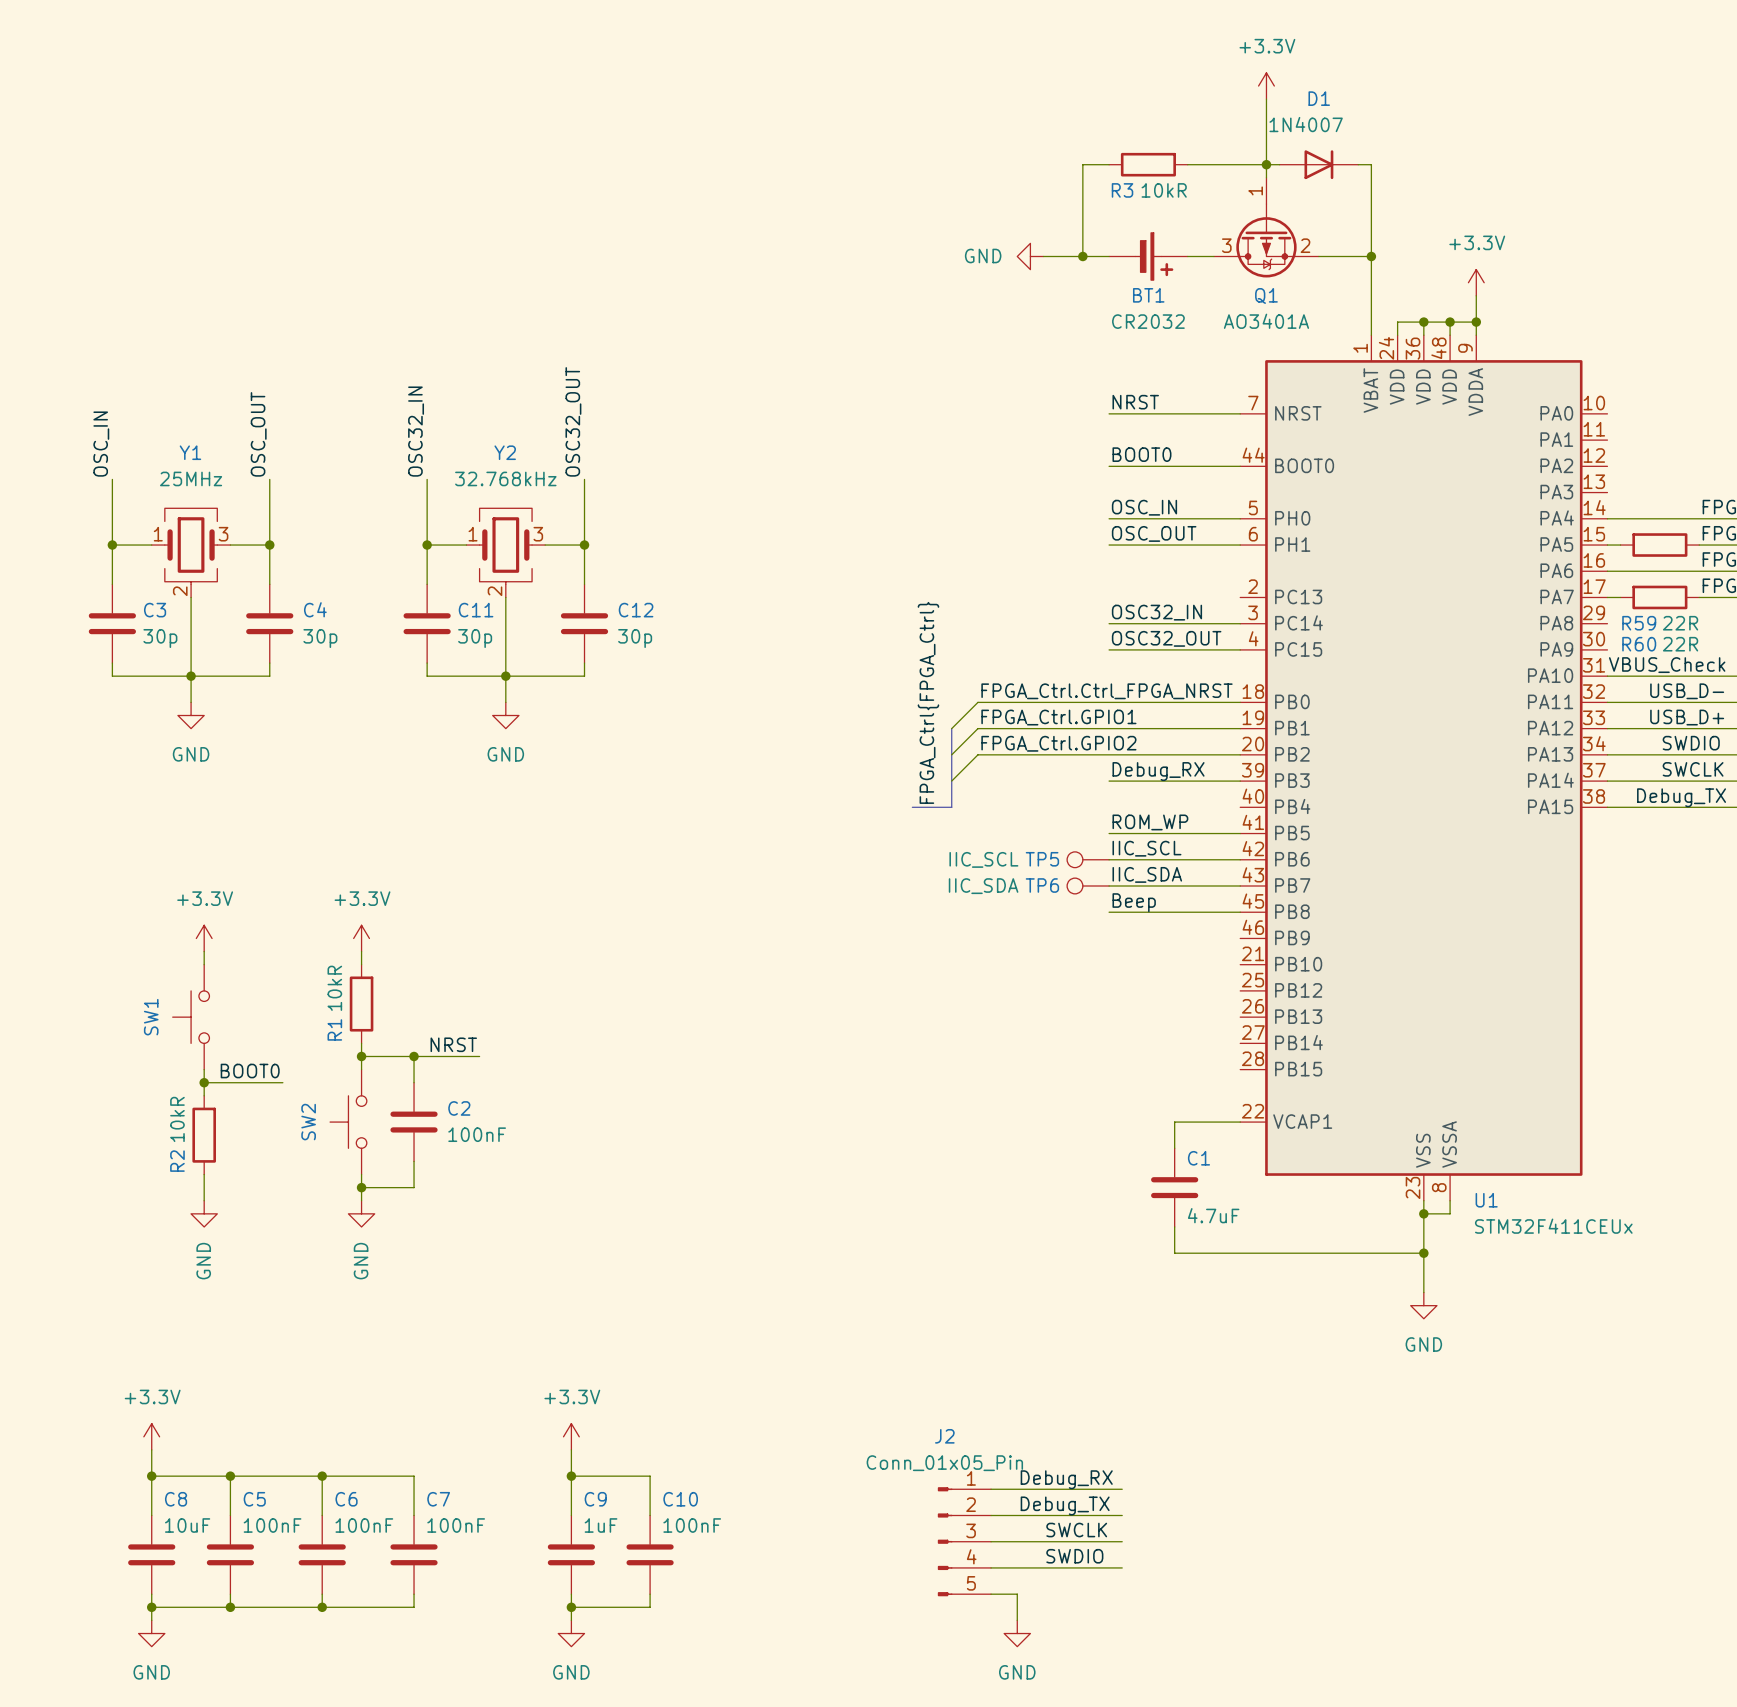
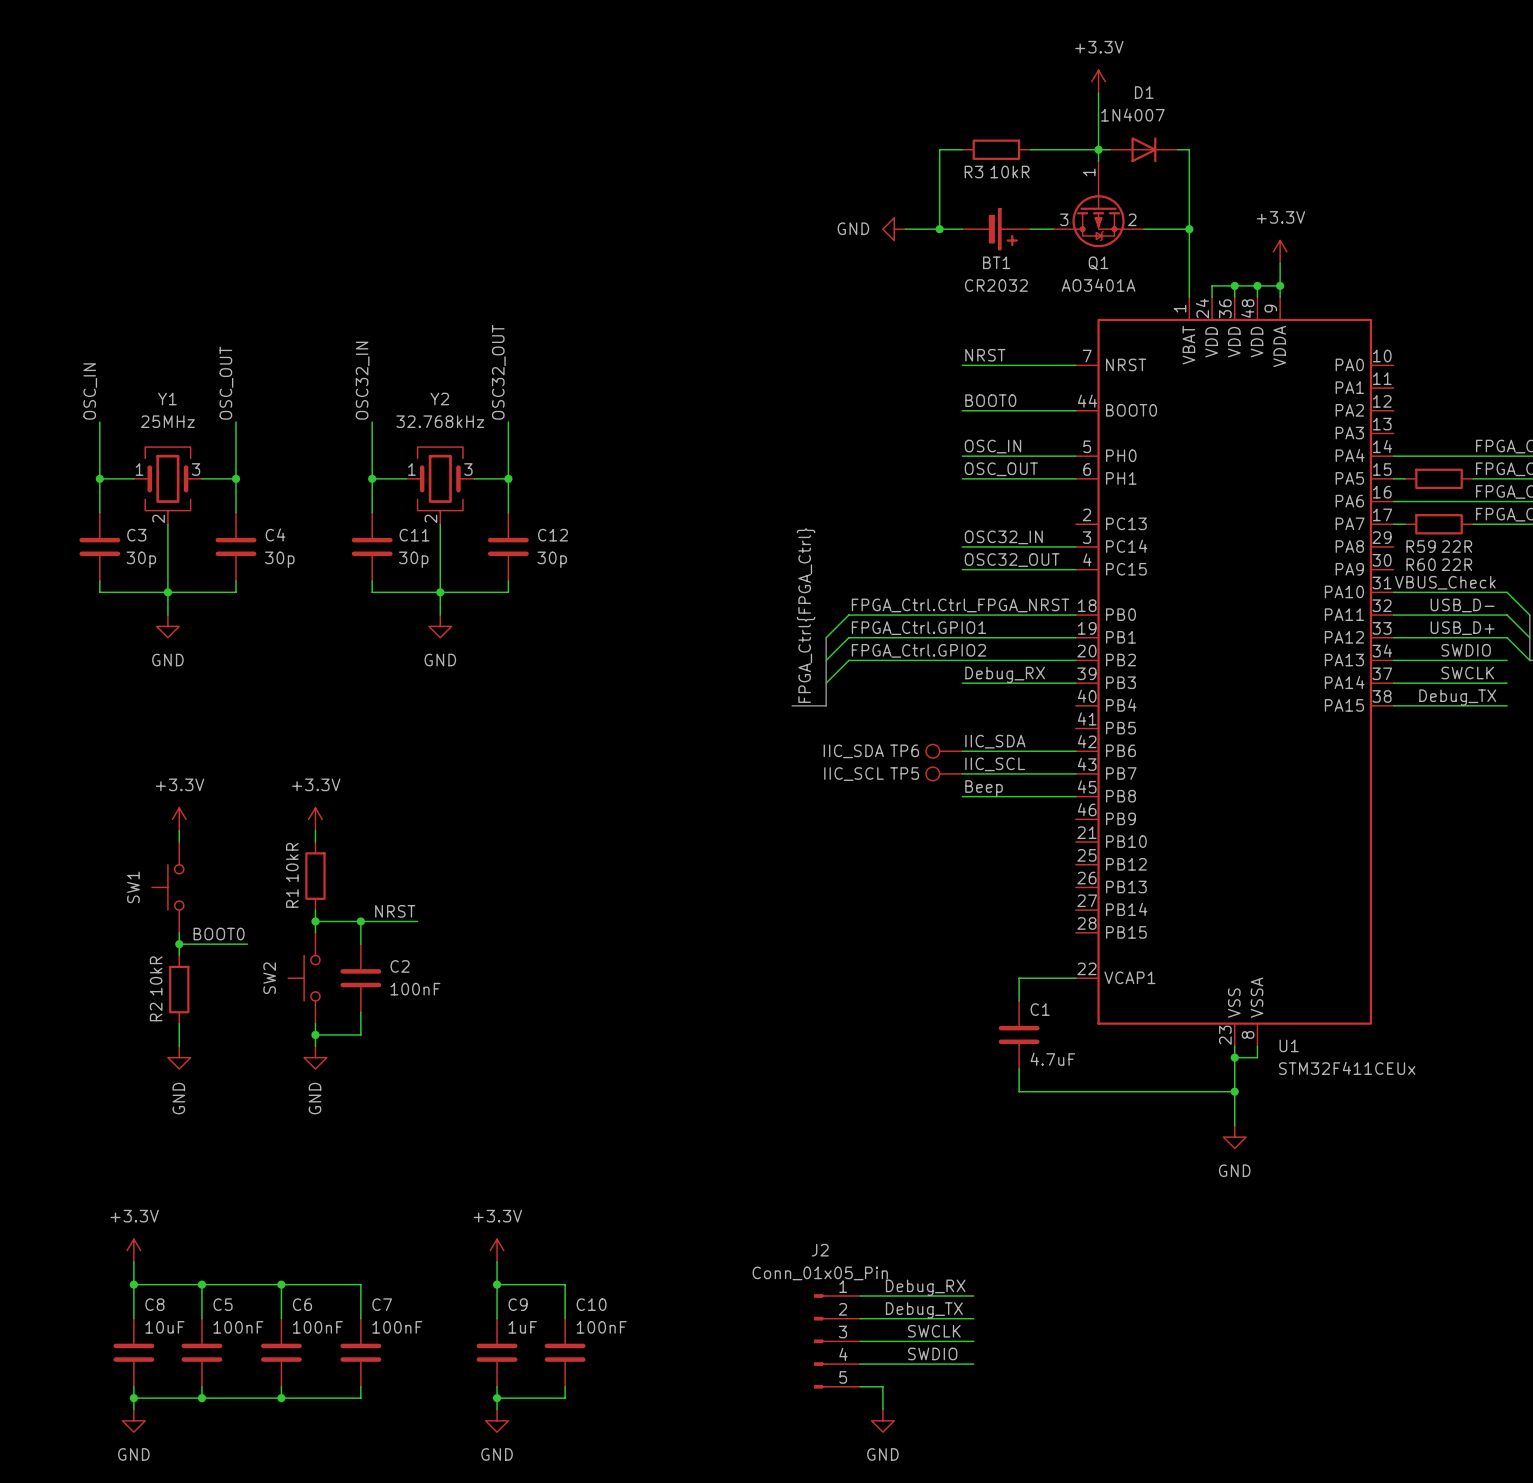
label: ROM_WP (1150, 822) -> none
wire: (1109, 833) (1240, 833) -> none
label: IIC_SCL (1146, 848) -> IIC_SDA (995, 741)
TP5 value: IIC_SCL (983, 859) -> IIC_SDA (853, 751)
TP5 name: TP5 (1042, 859) -> TP6 (904, 750)
label: IIC_SDA (1147, 874) -> IIC_SCL (995, 764)
TP6 name: TP6 (1042, 885) -> TP5 (904, 773)
TP6 value: IIC_SDA (983, 886) -> IIC_SCL (854, 774)

